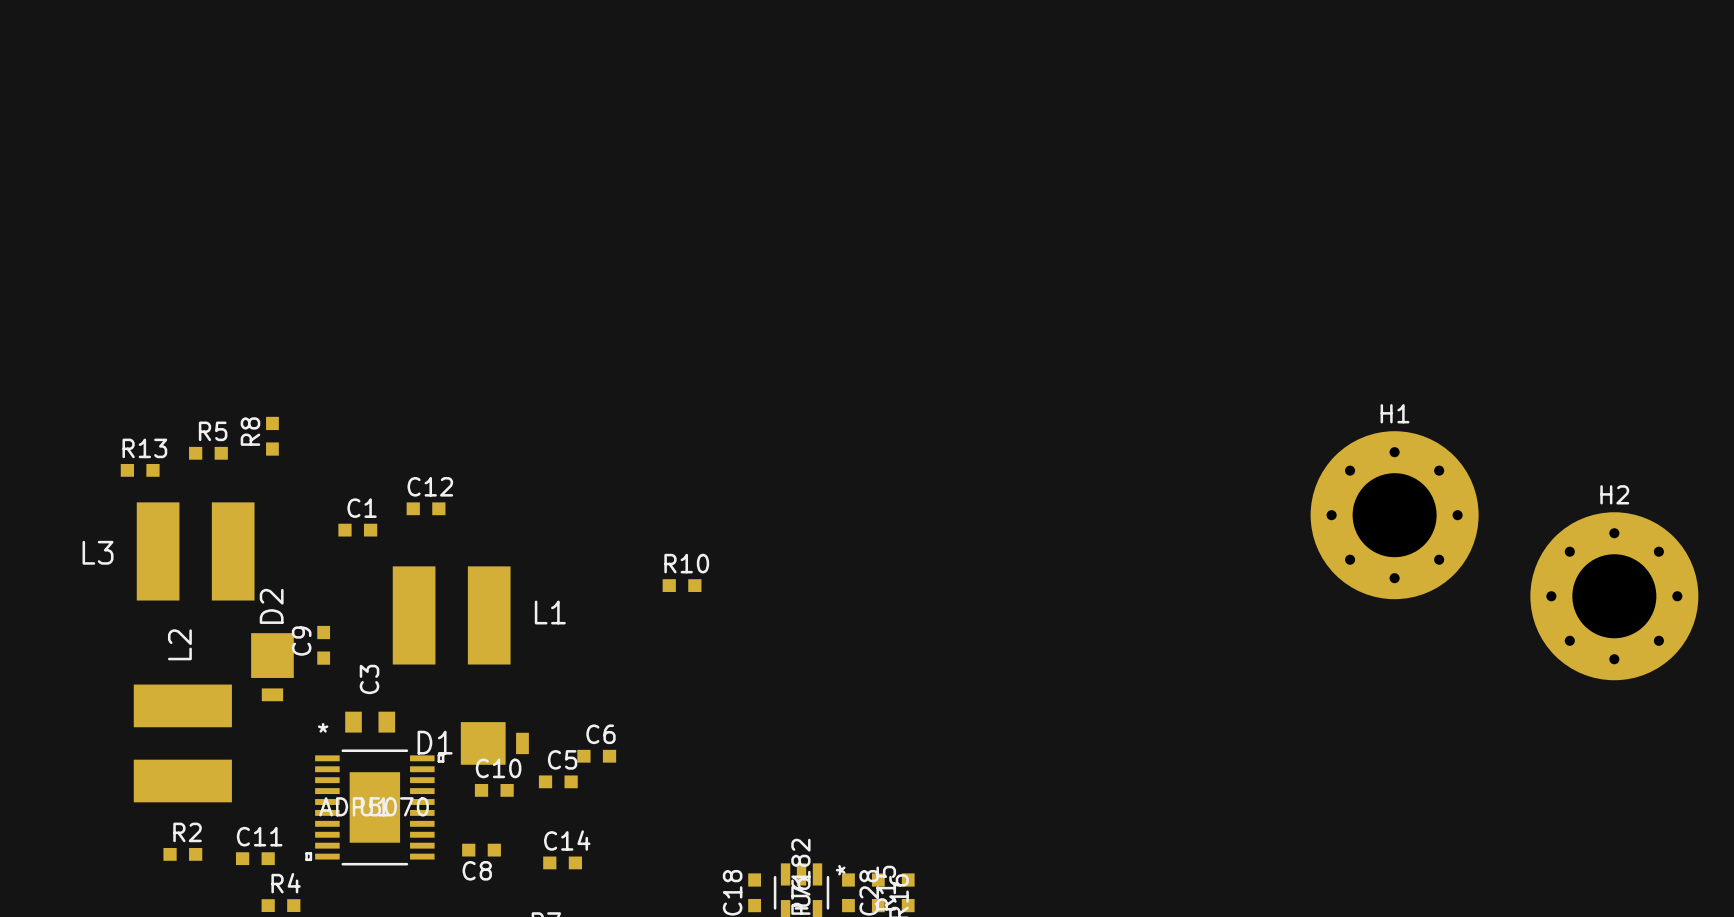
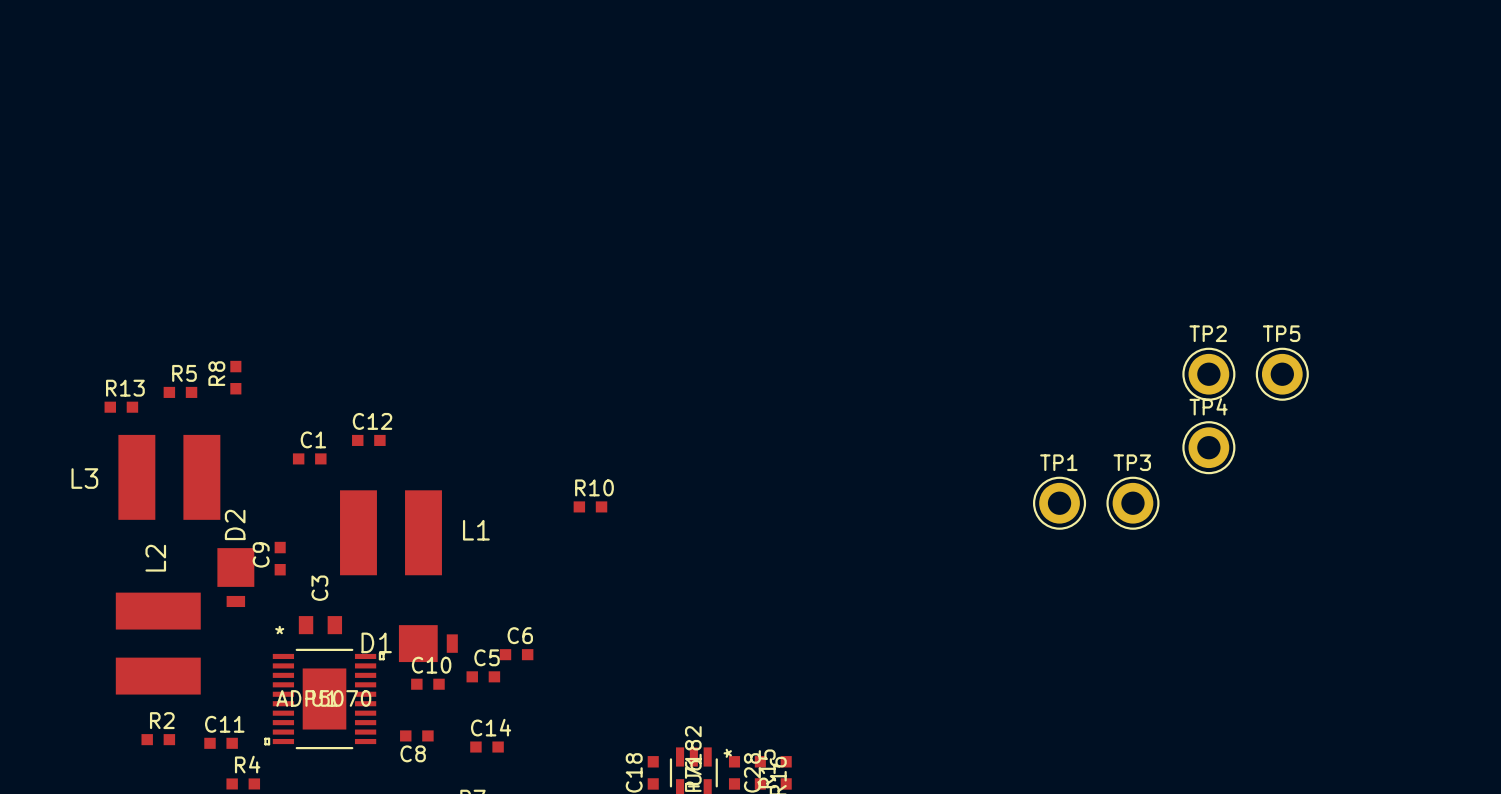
TP2: none -> (1208, 374)
TP5: none -> (1282, 374)
H1: (1394, 515) -> none
TP4: none -> (1208, 447)
TP1: none -> (1059, 503)
TP3: none -> (1132, 503)
H2: (1614, 596) -> none

